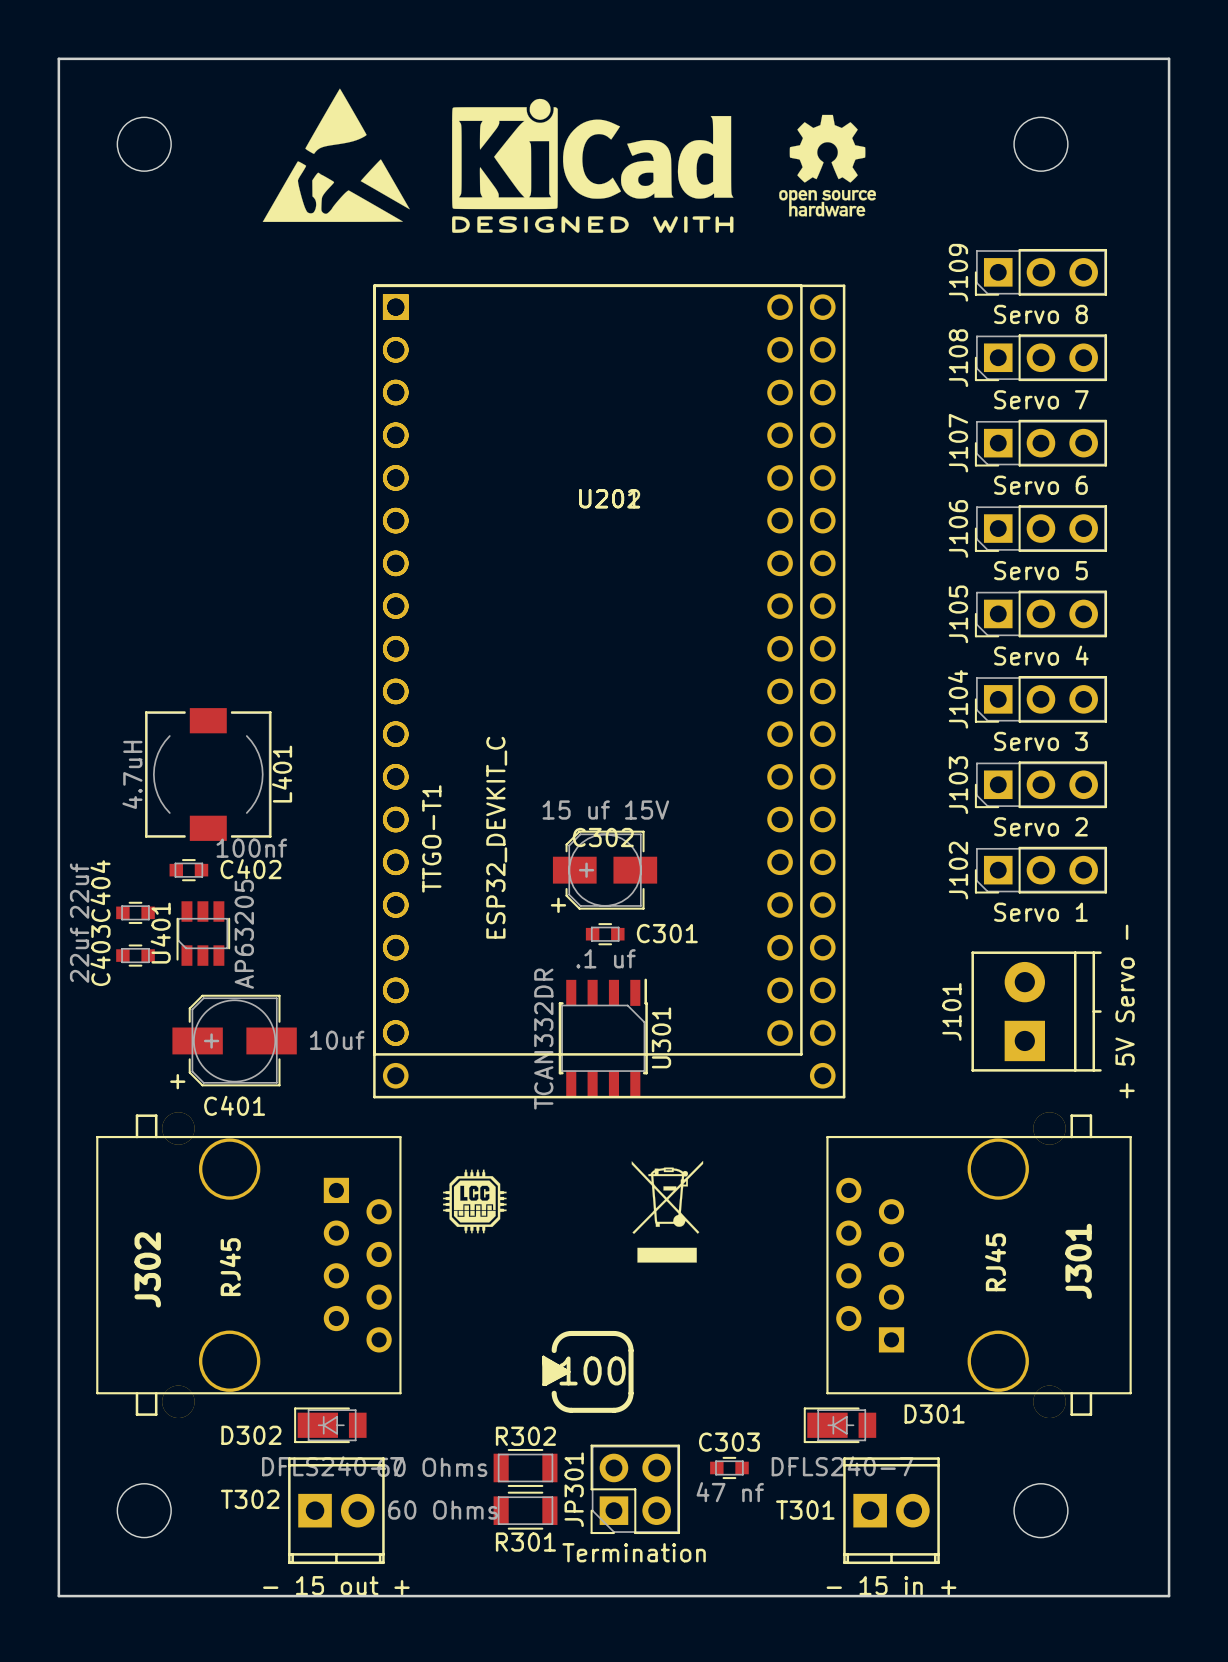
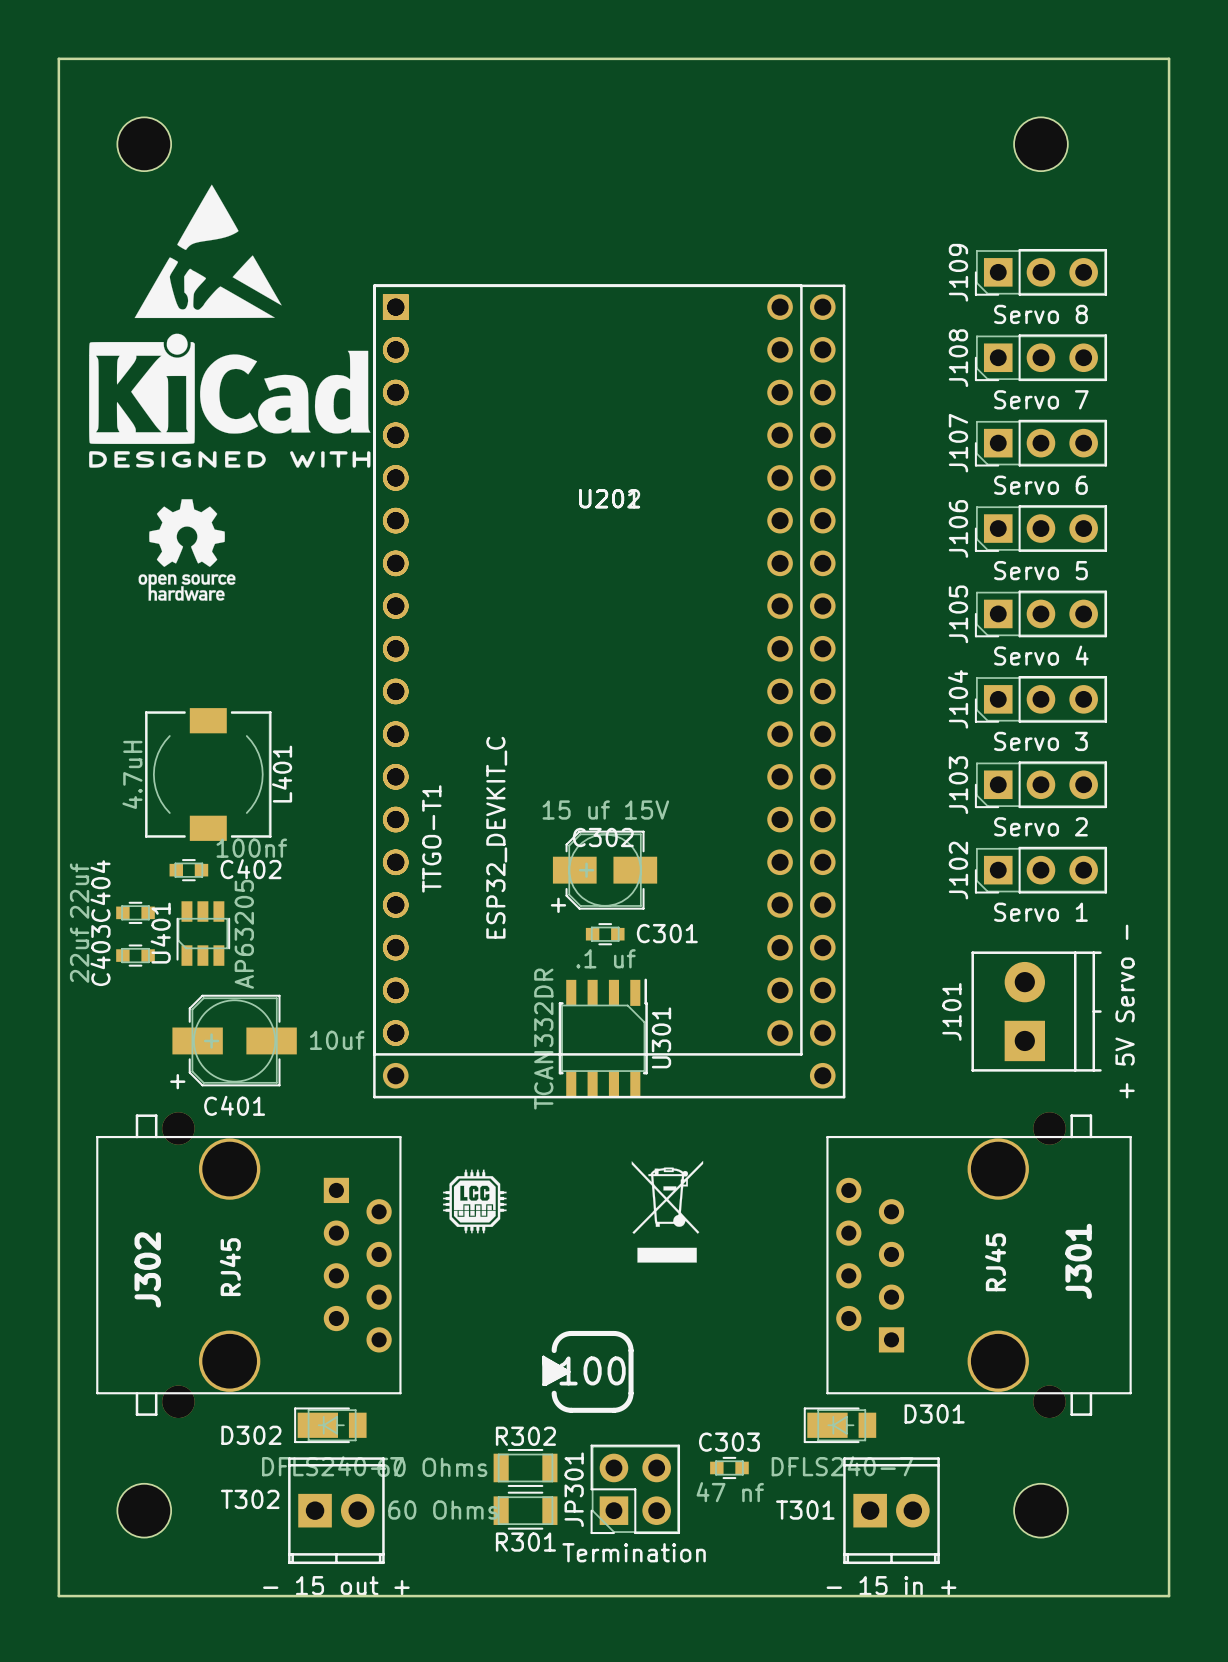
drawing: [452, 98, 734, 233] -> none
drawing: [779, 114, 876, 217] -> none
drawing position: (336, 155) -> (208, 251)
drawing: none -> [89, 333, 371, 468]
drawing: none -> [138, 499, 236, 601]

